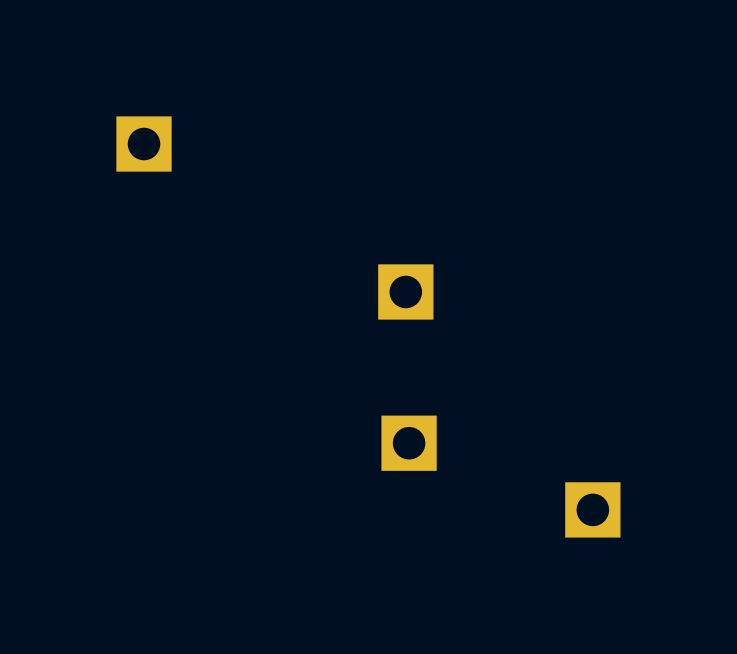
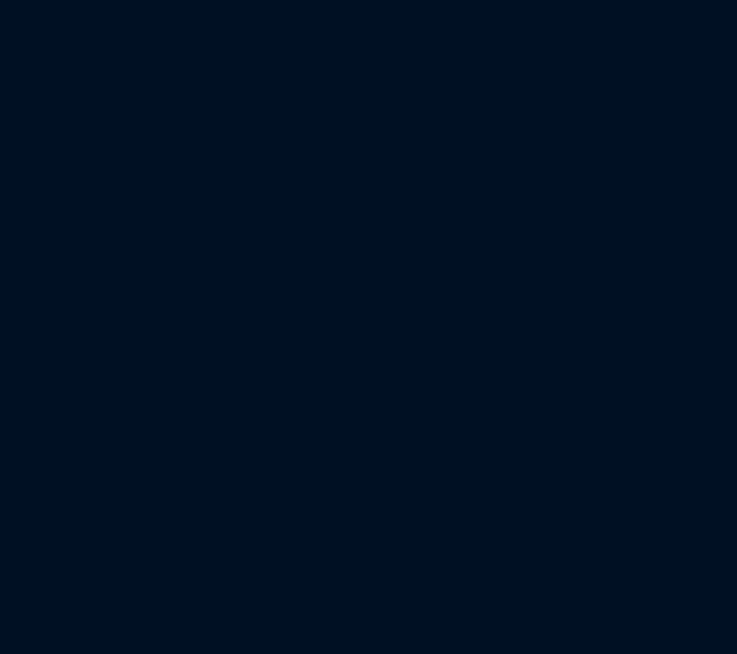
part: (144, 144) -> none
part: (405, 291) -> none
part: (409, 443) -> none
part: (592, 509) -> none

